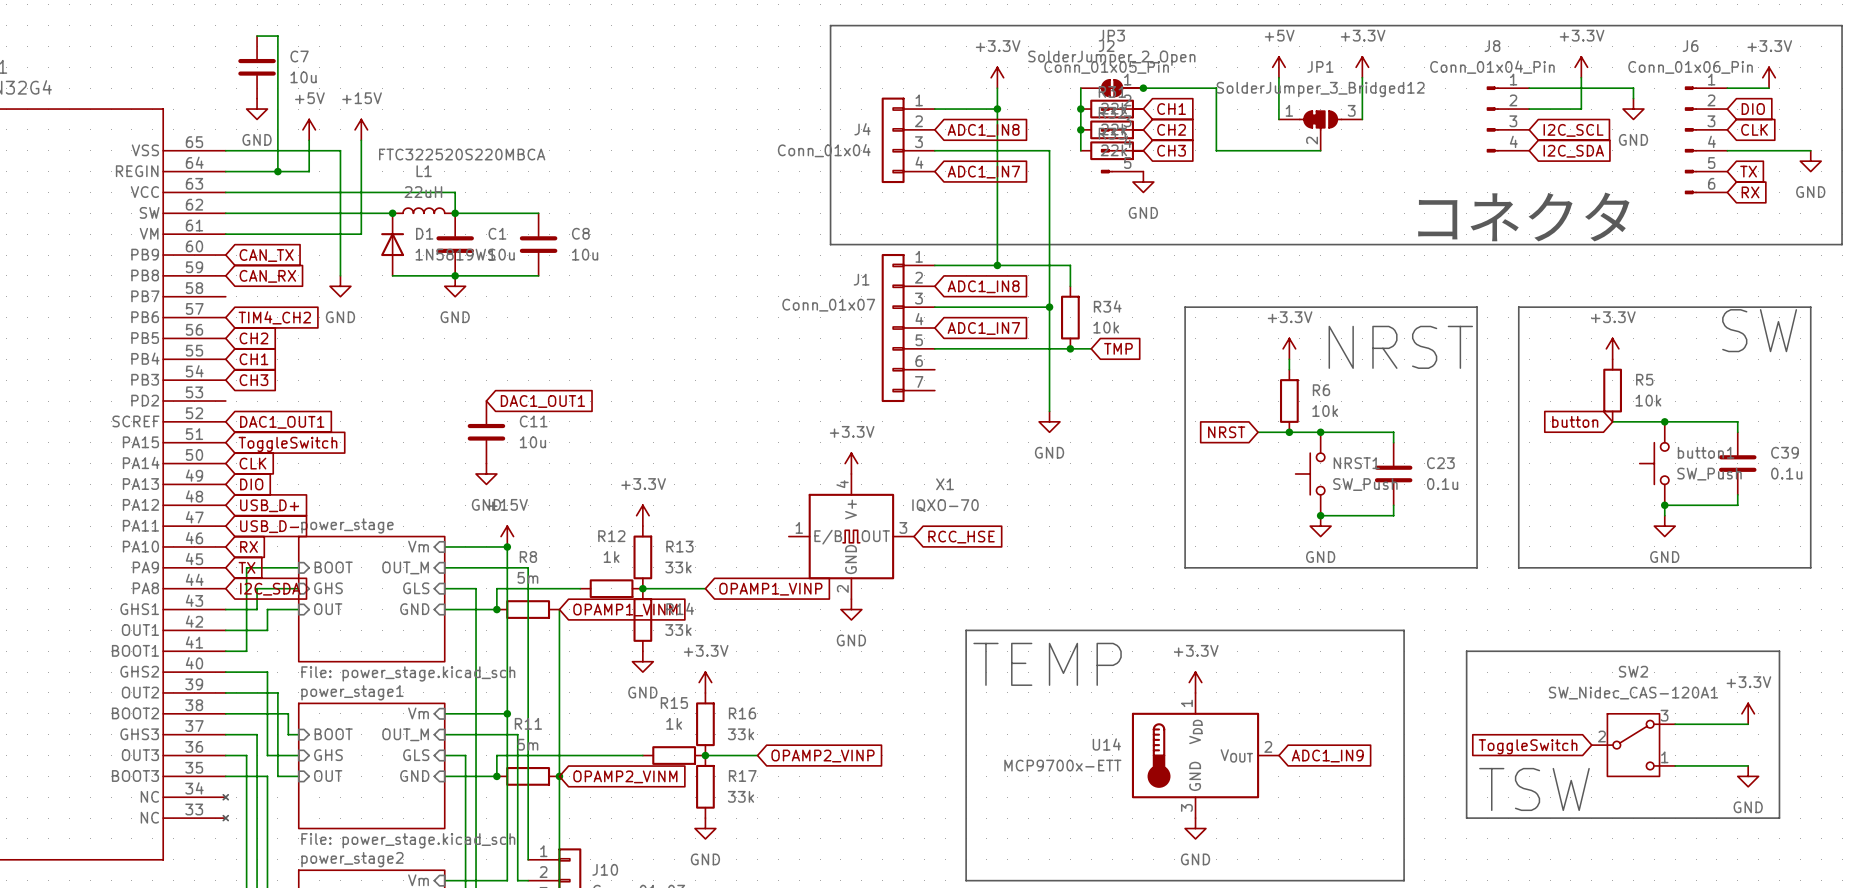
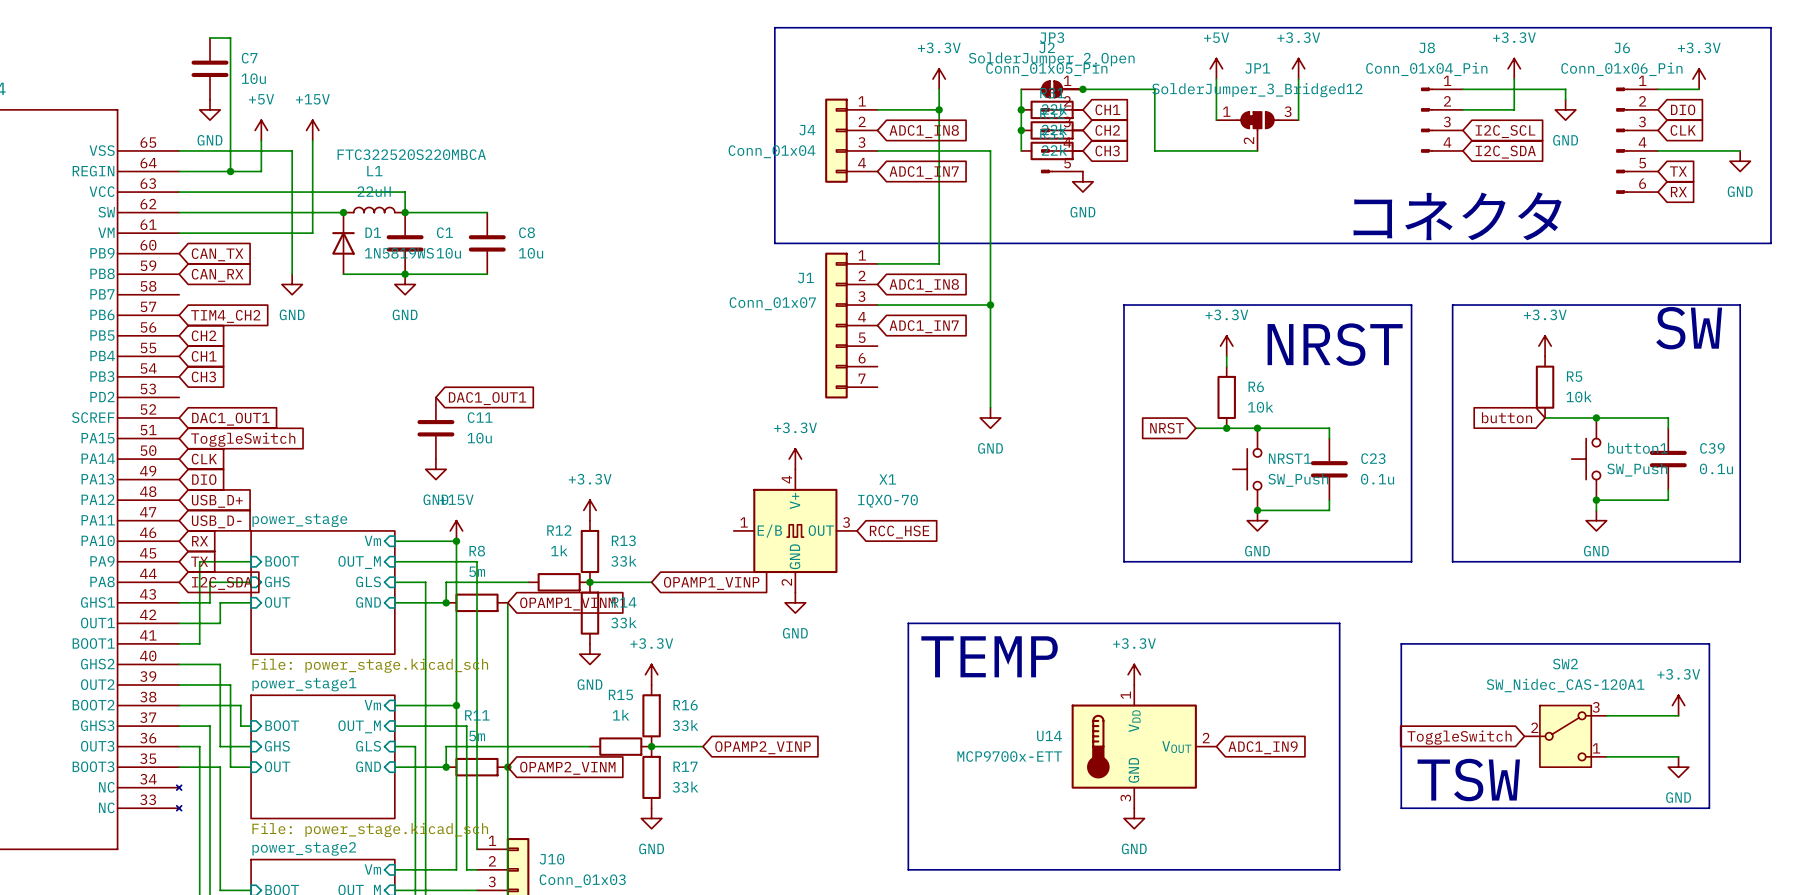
wire: (997, 265) (1070, 265) (1070, 286) -> none
junction: (997, 265) -> none
R34: 10k (1070, 317) -> none
wire: (934, 348) (1091, 348) -> none
junction: (1070, 348) -> none
global label: TMP (1118, 348) -> none

